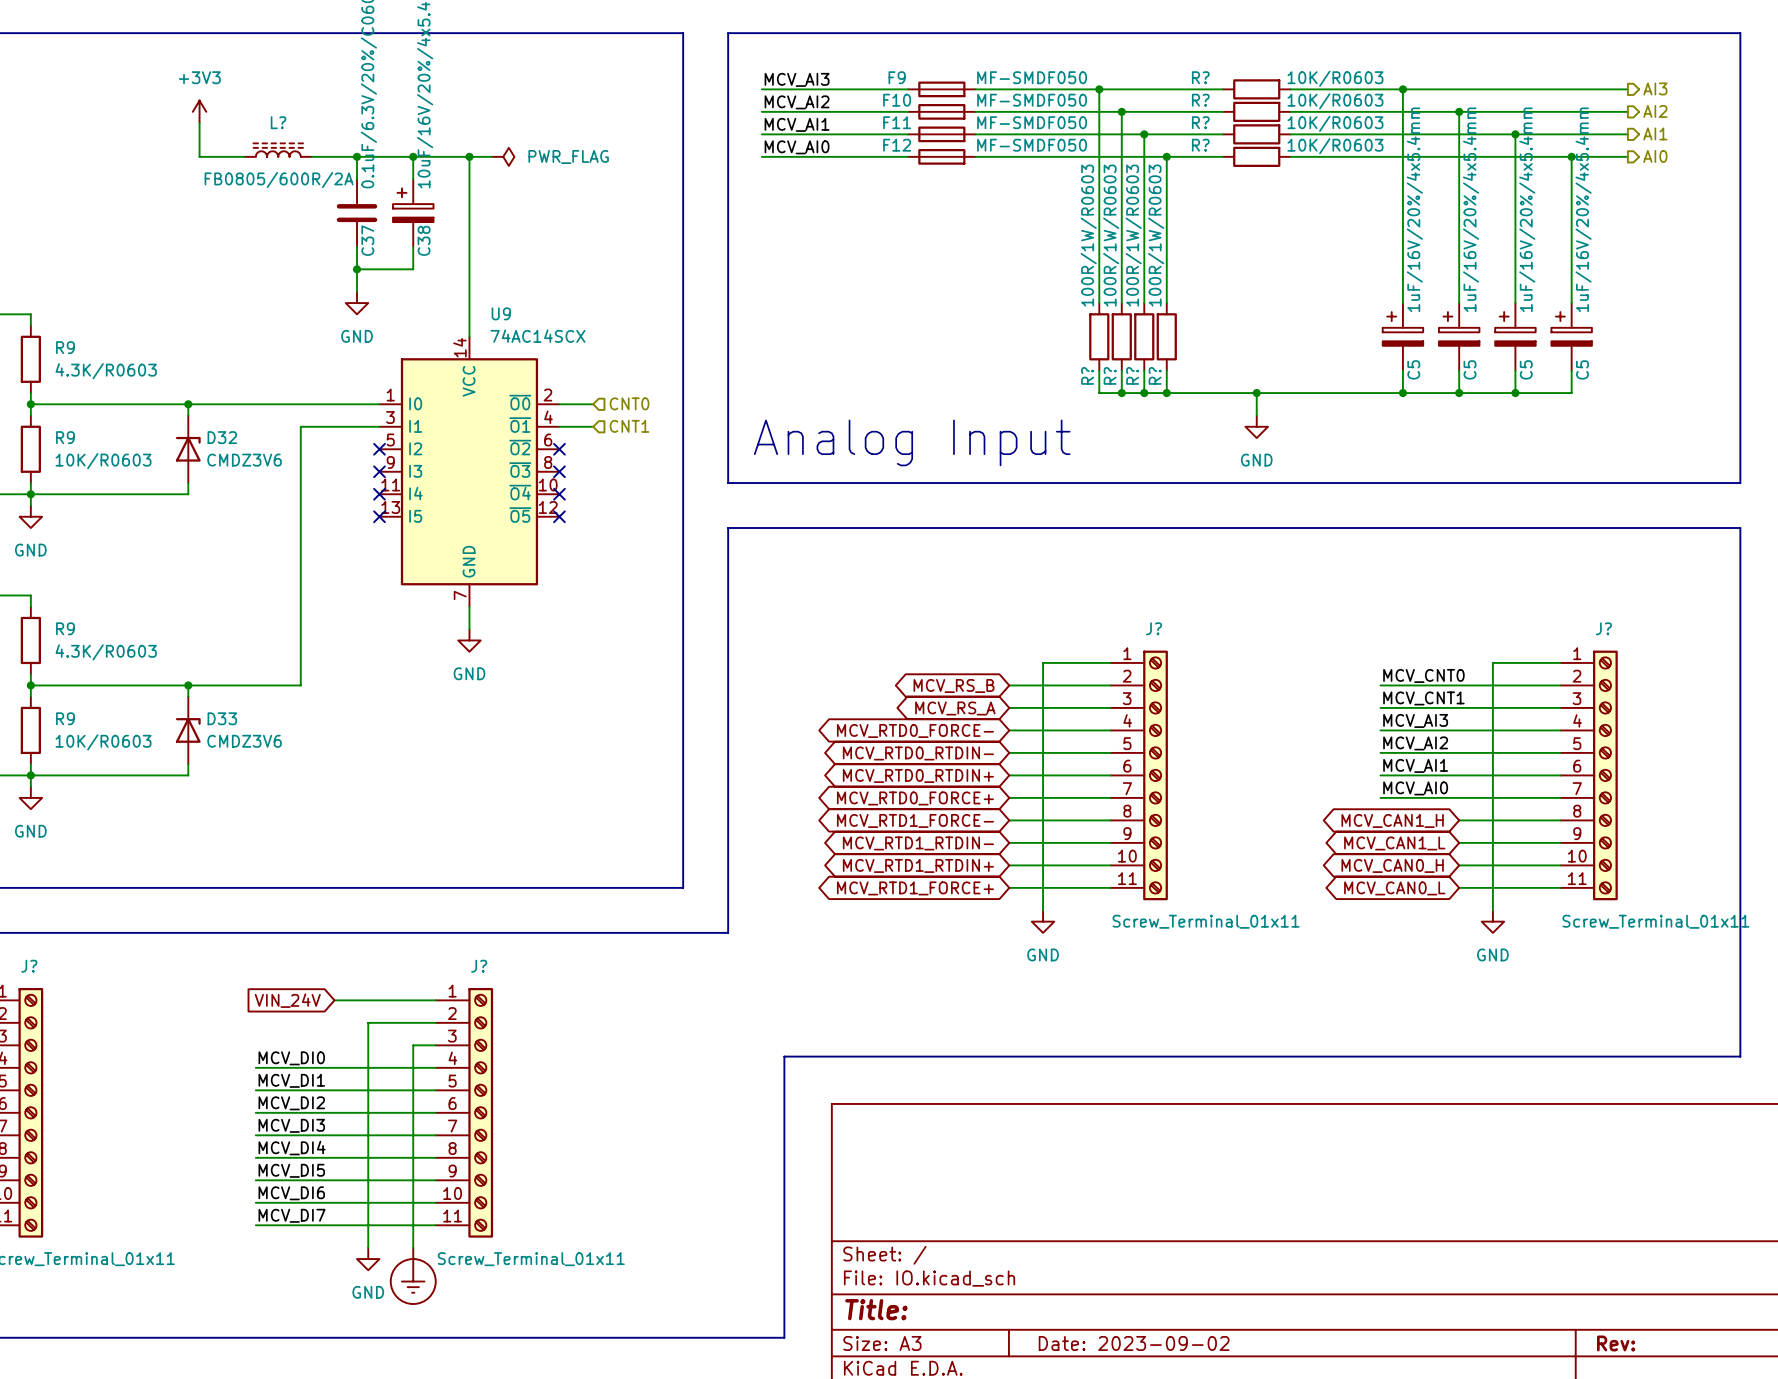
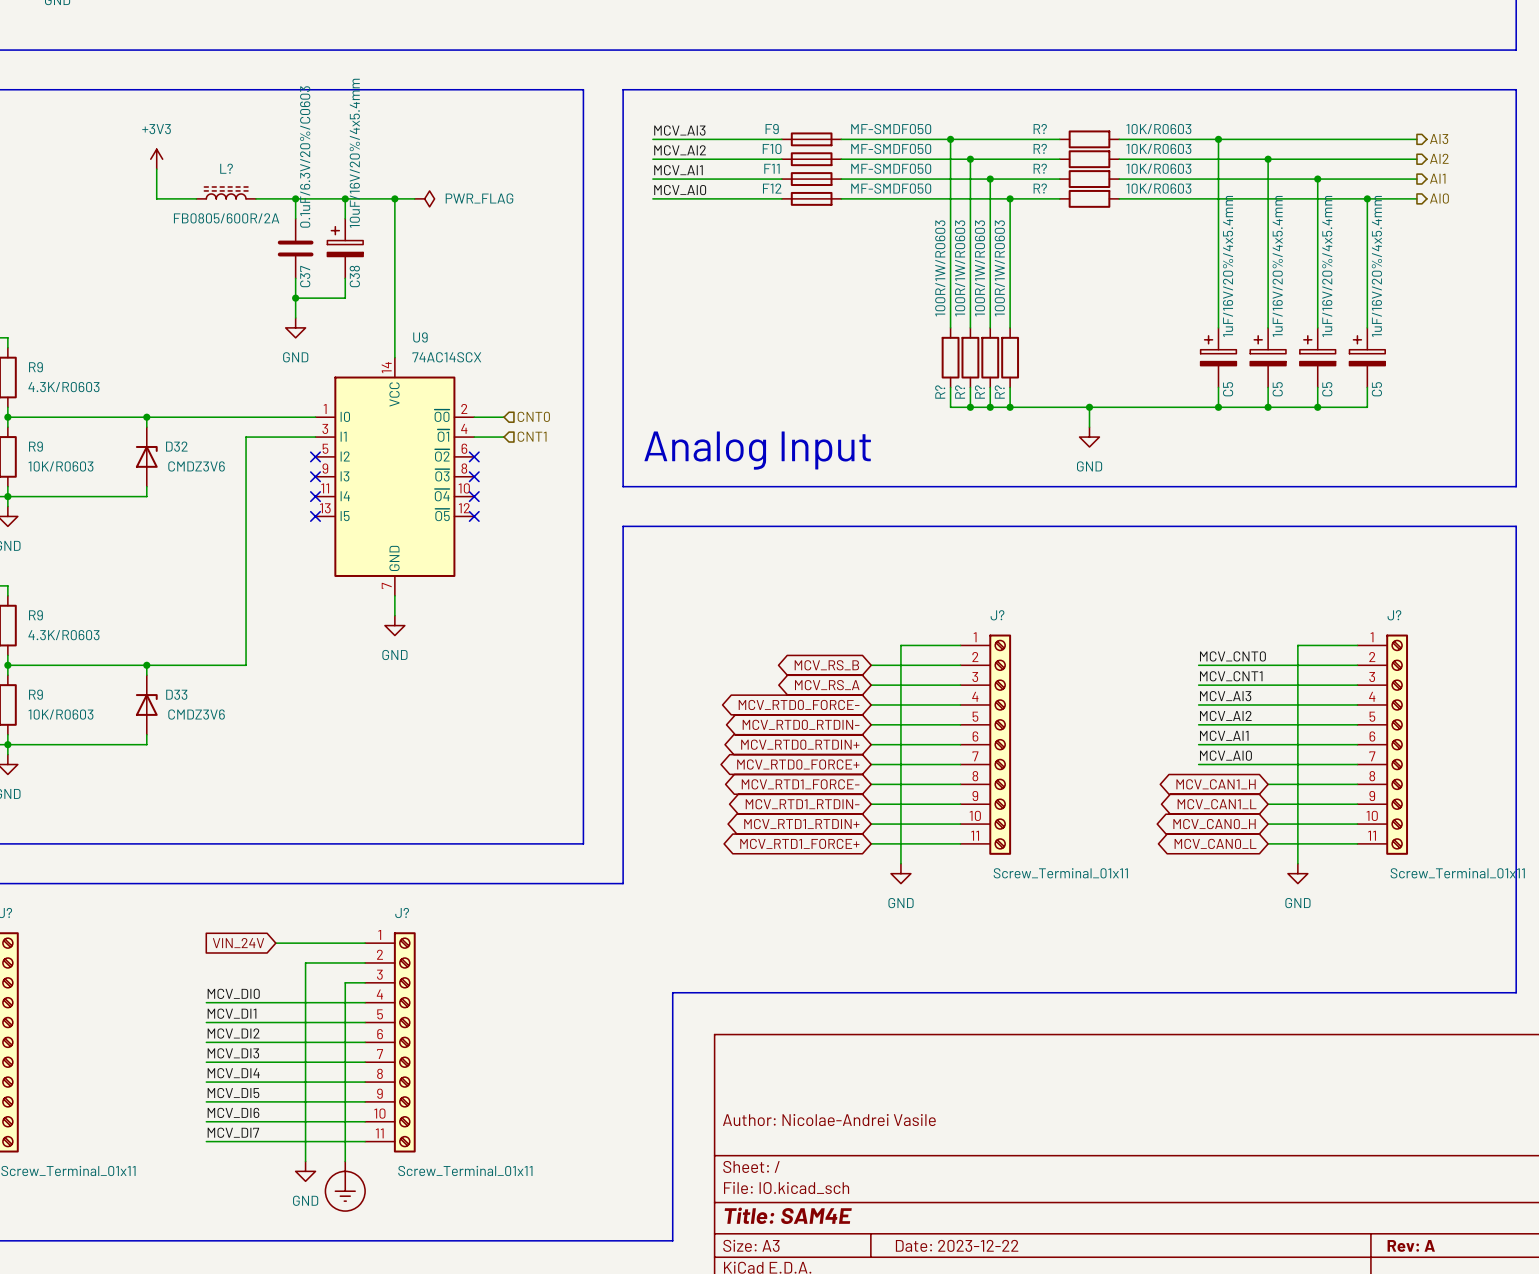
title block: none -> Author: Nicolae-Andrei Vasile (829, 1120)
title block: Title: (876, 1309) -> Title: SAM4E (788, 1215)
title block: Date: 2023-09-02 (1134, 1343) -> Date: 2023-12-22 (957, 1245)
title block: Rev: (1616, 1343) -> Rev: A (1411, 1245)

